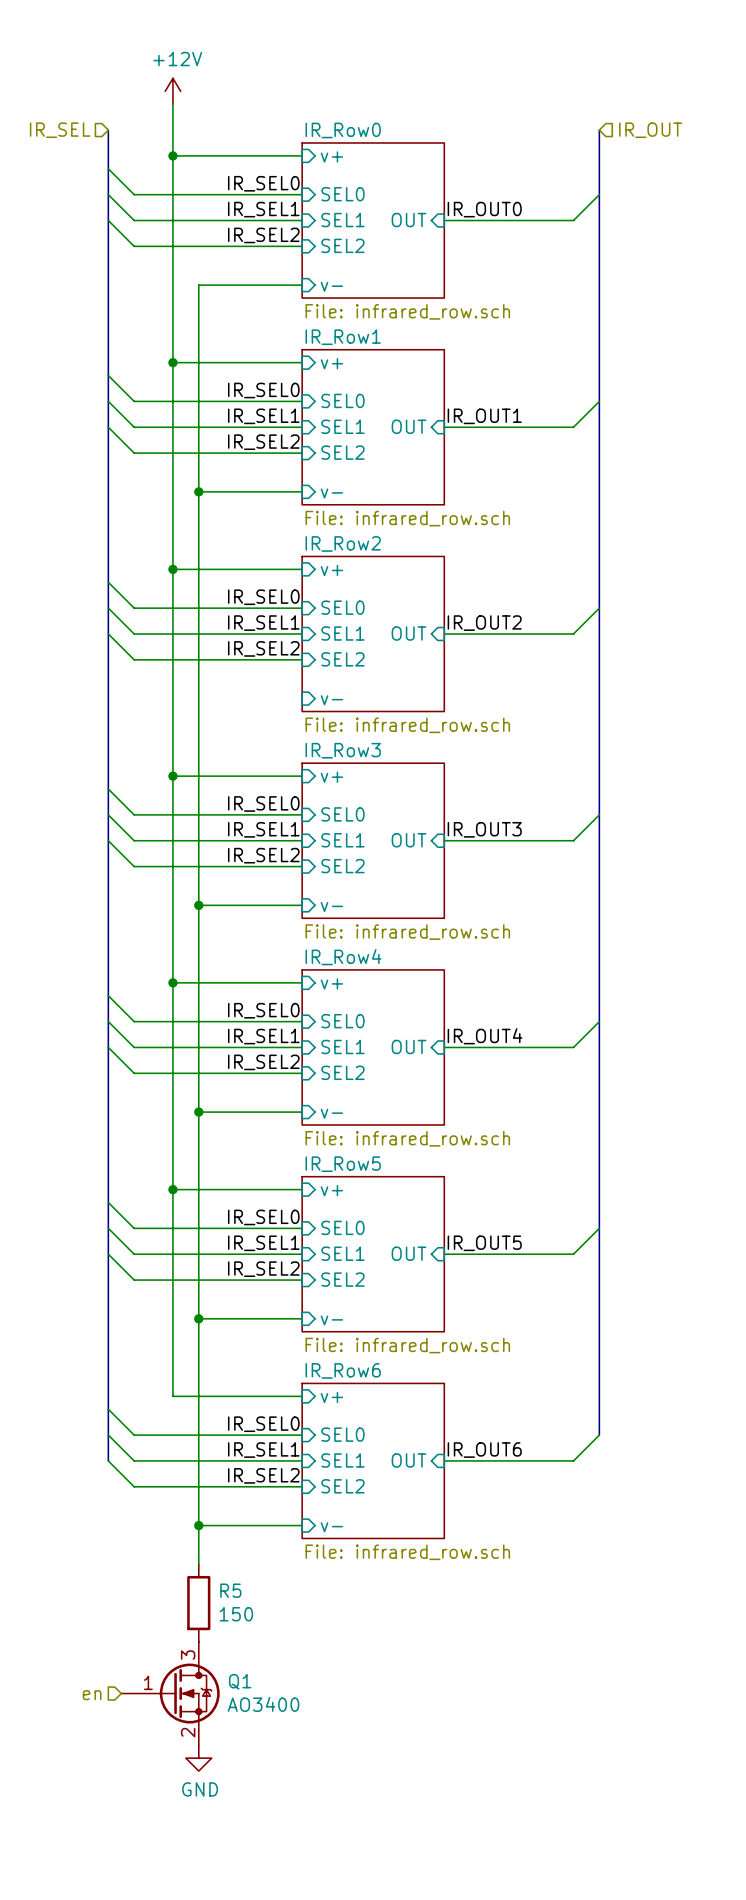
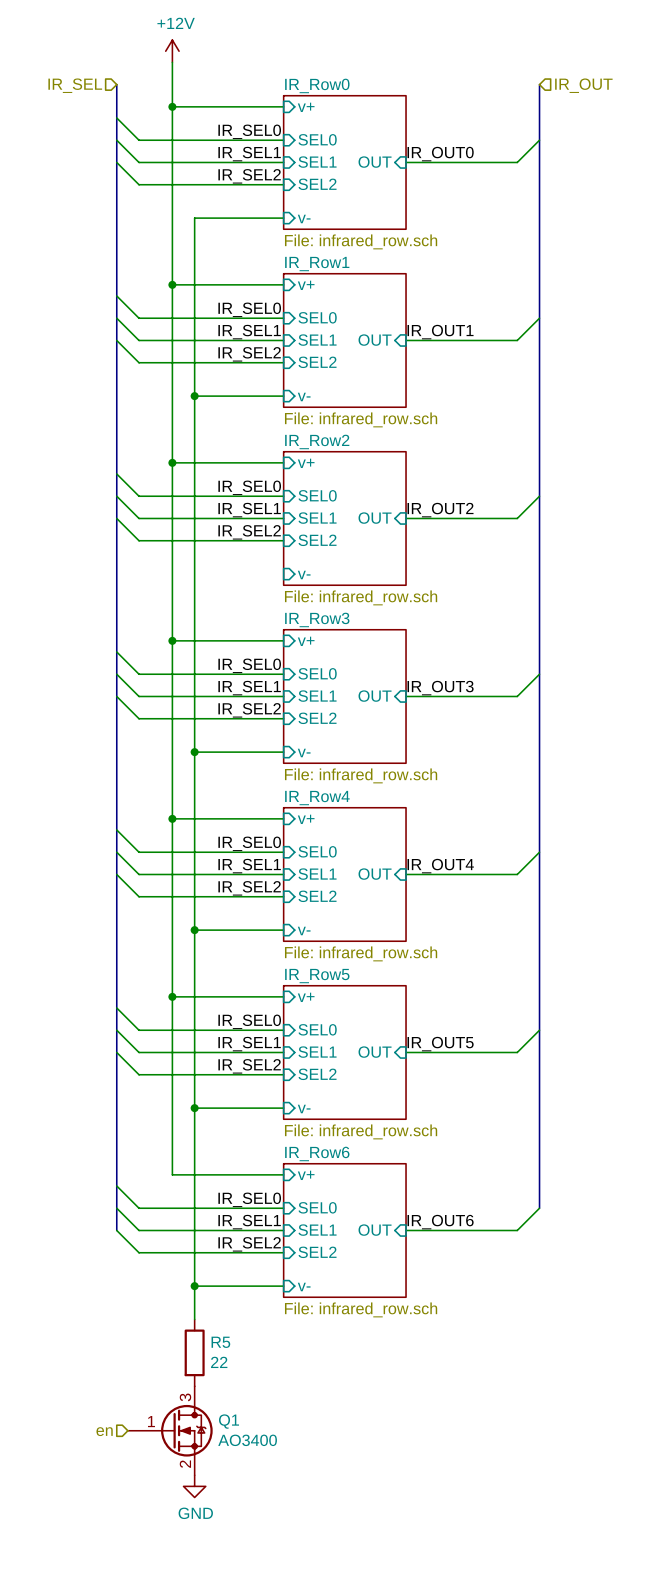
R5 value: 150 (236, 1614) -> 22 (219, 1362)

